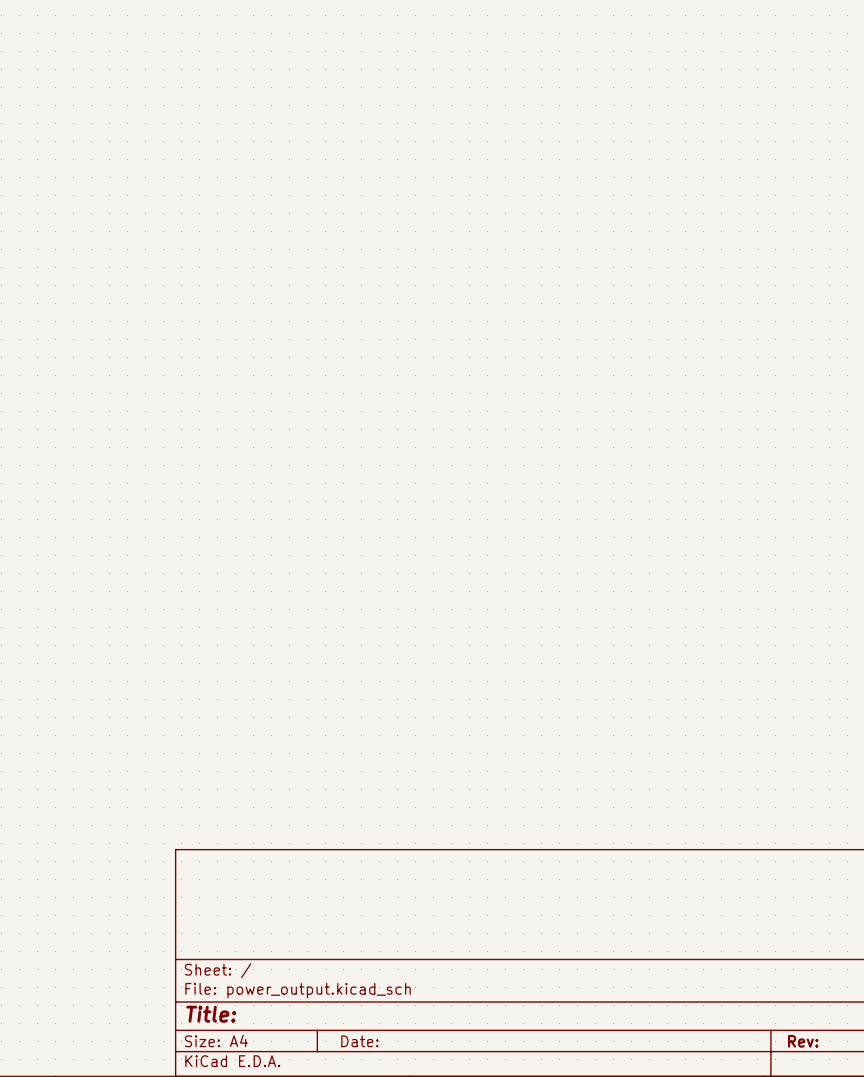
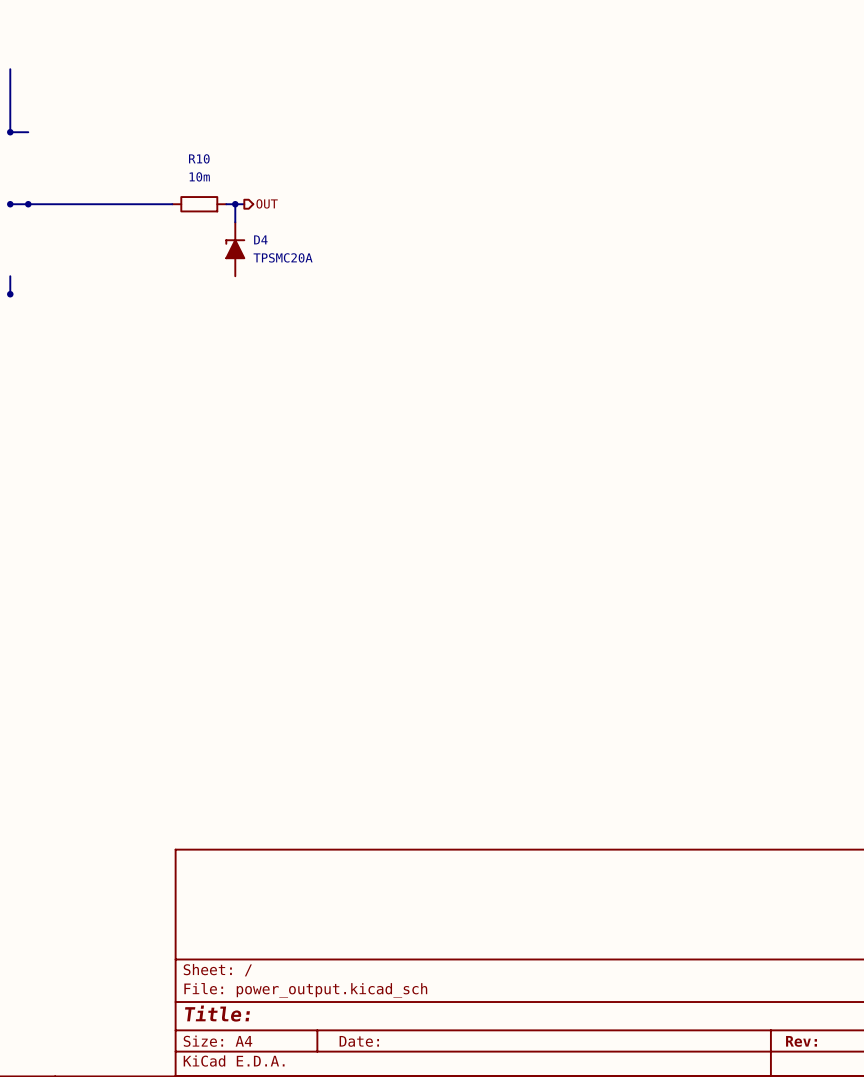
wire: none -> (10, 69) (10, 132) (28, 132)
junction: none -> (10, 132)
hierarchical label: none -> OUT (267, 203)
wire: none -> (10, 204) (172, 204)
junction: none -> (10, 204)
junction: none -> (28, 204)
R10: none -> 10m (199, 204)
wire: none -> (226, 204) (244, 204)
wire: none -> (235, 204) (235, 222)
junction: none -> (235, 204)
D4: none -> TPSMC20A (235, 249)
wire: none -> (10, 276) (10, 294)
junction: none -> (10, 294)

